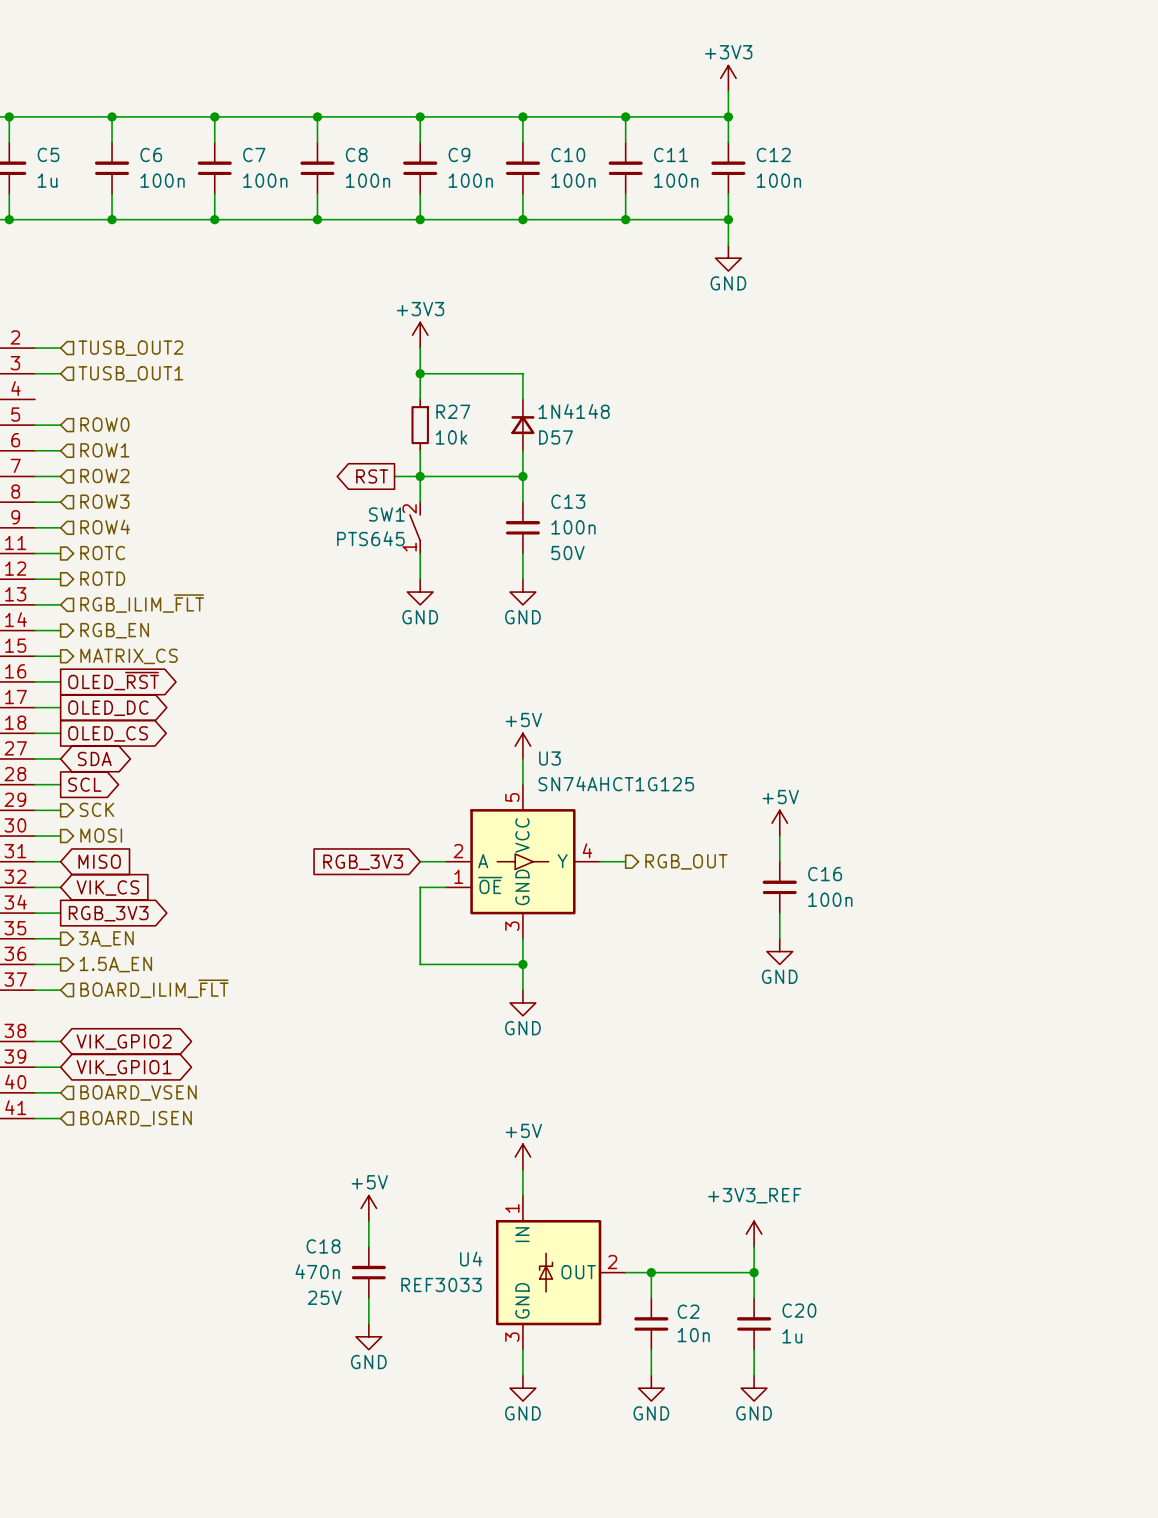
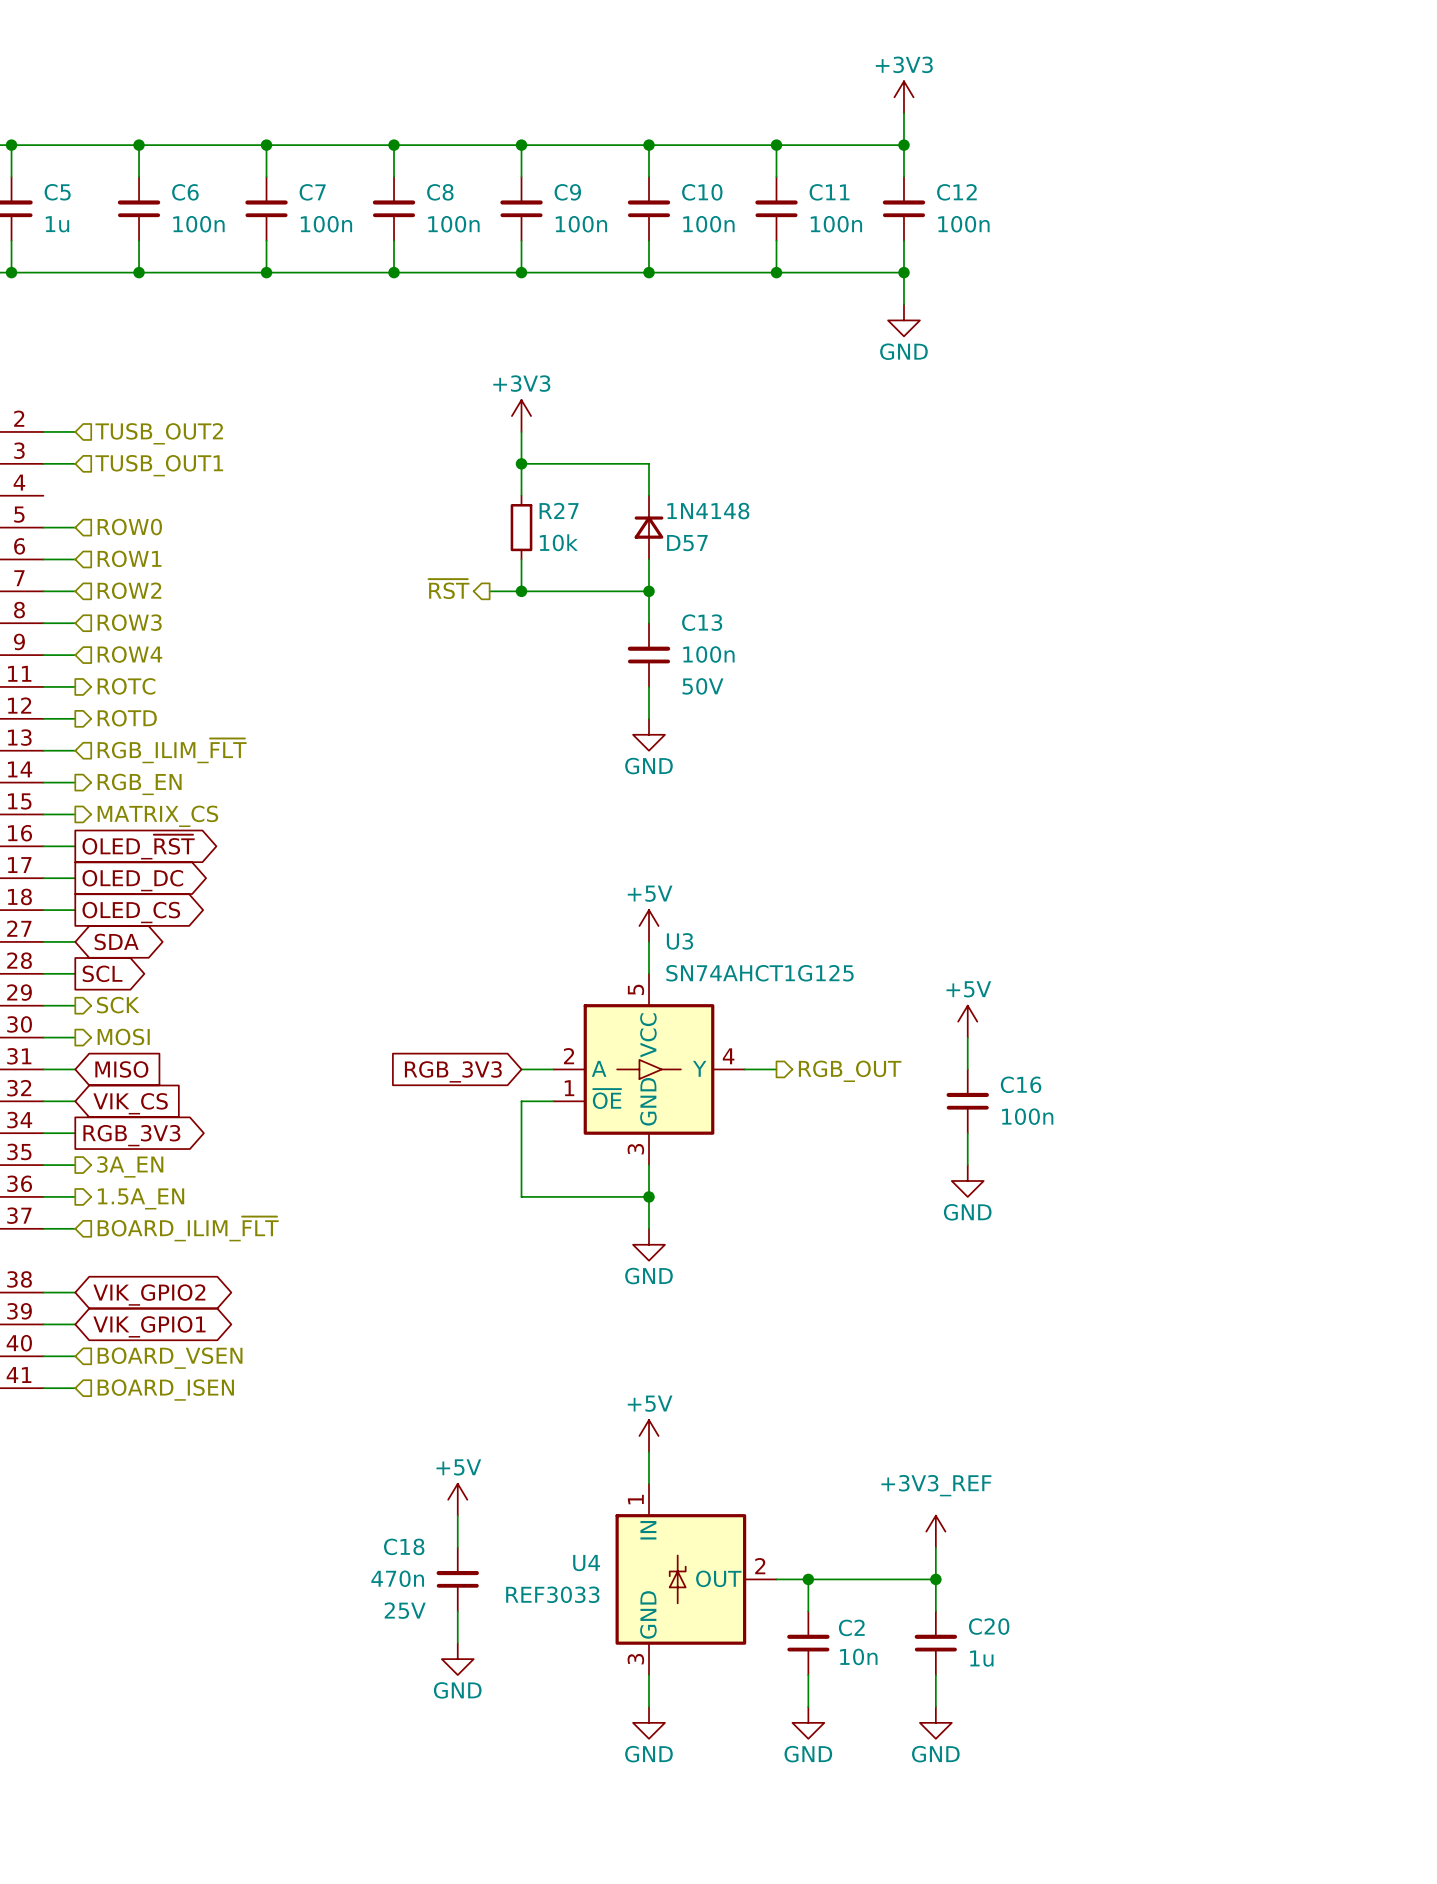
hierarchical label: none -> ~{RST} (449, 589)
global label: RST (372, 476) -> none
wire: (420, 476) (420, 502) -> none
SW1: PTS645 (415, 527) -> none
wire: (420, 553) (420, 579) -> none
power symbol: GND (420, 592) -> none

